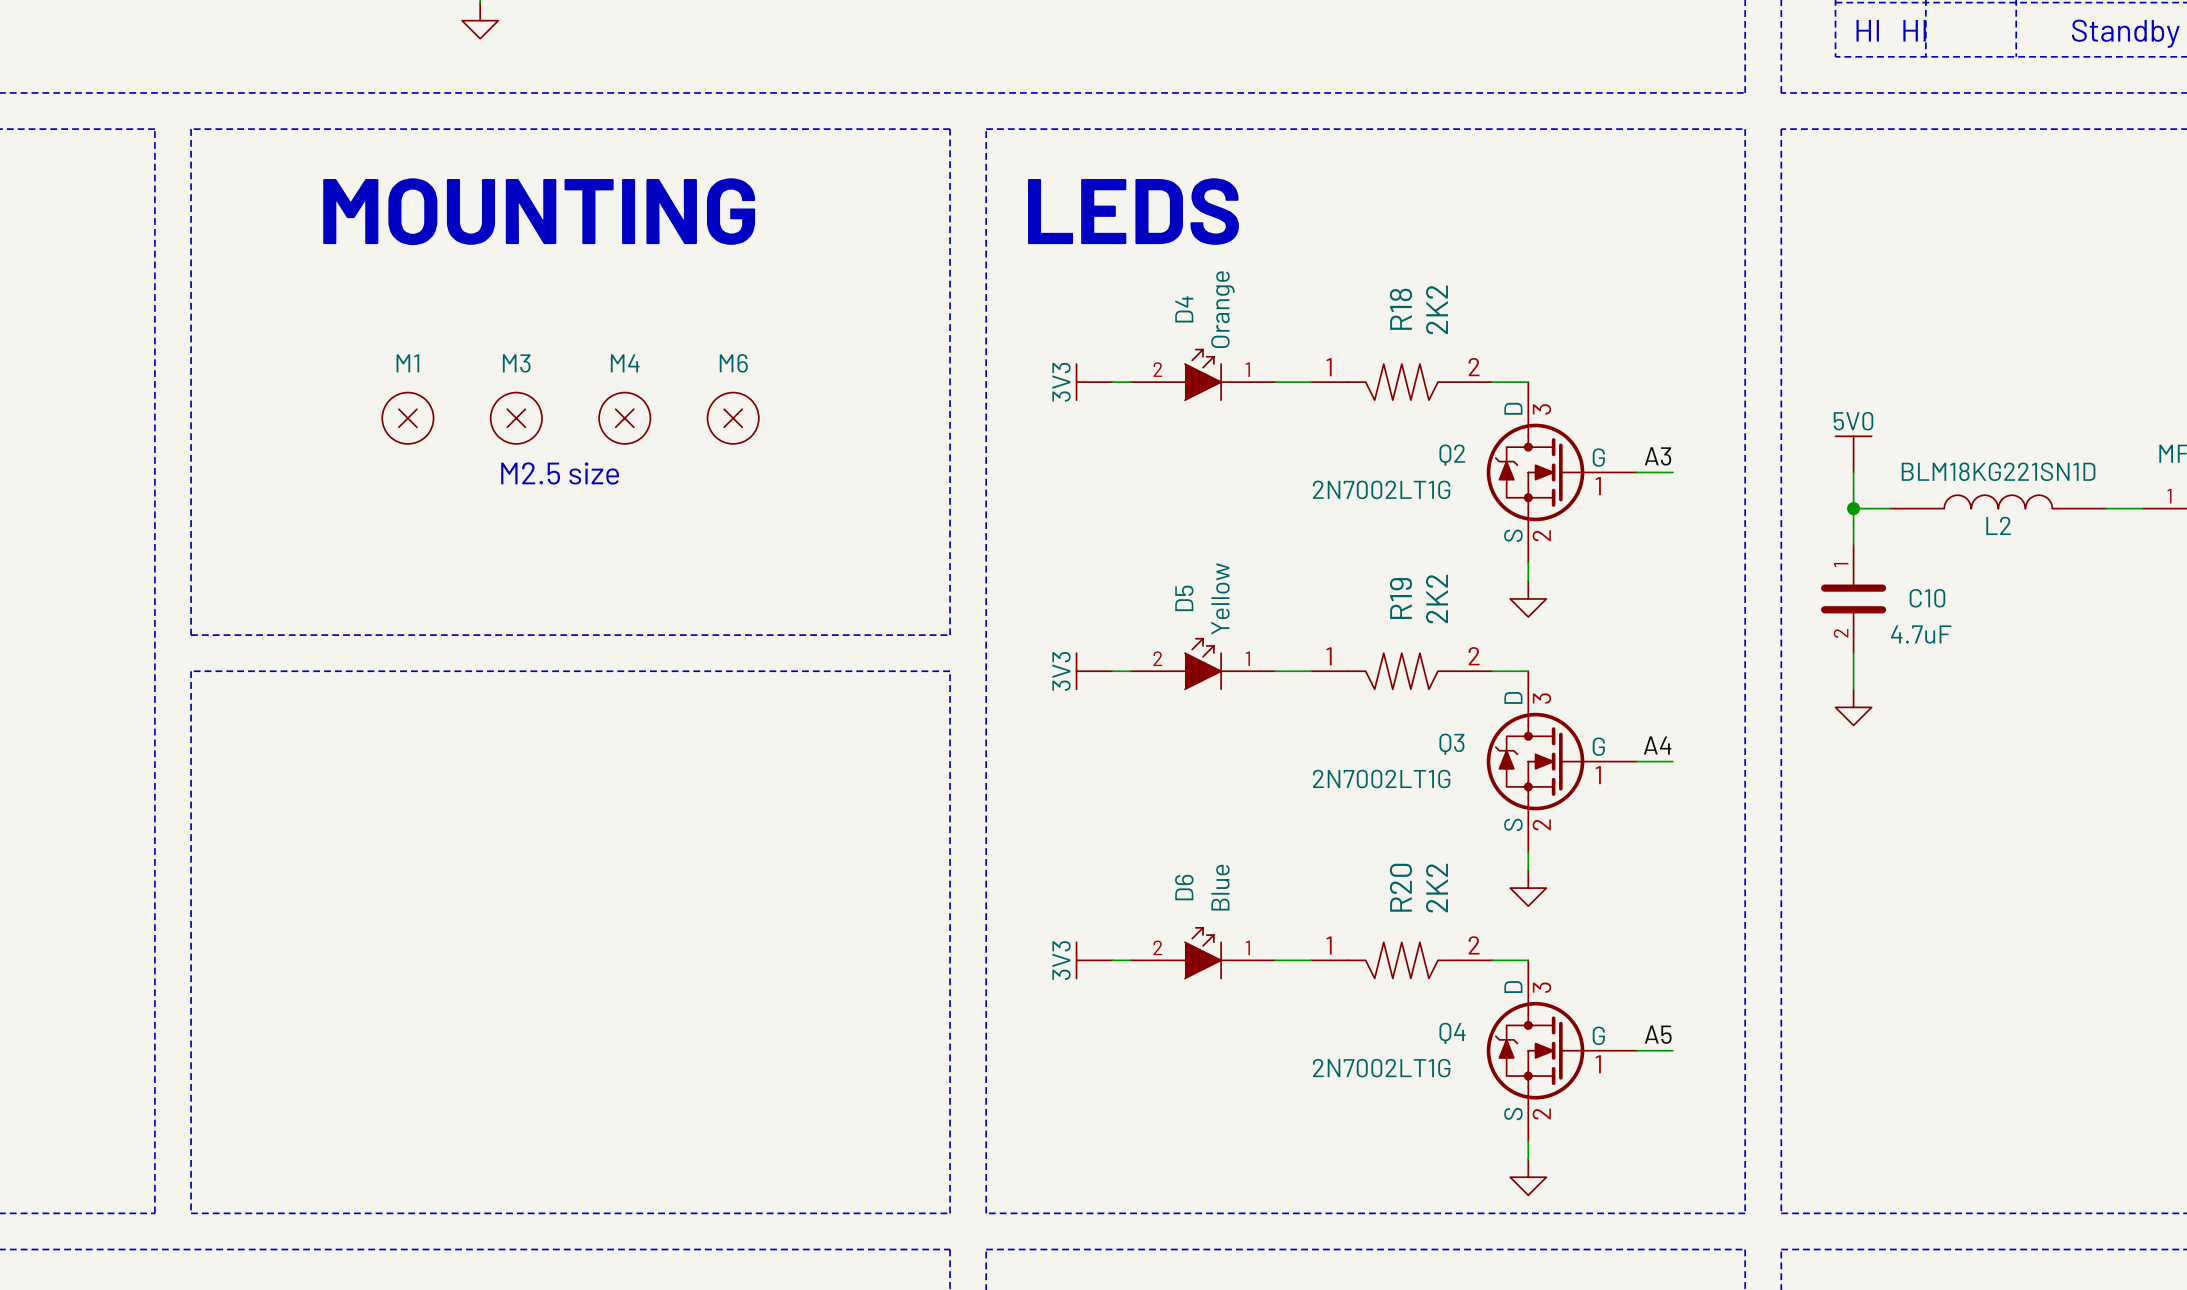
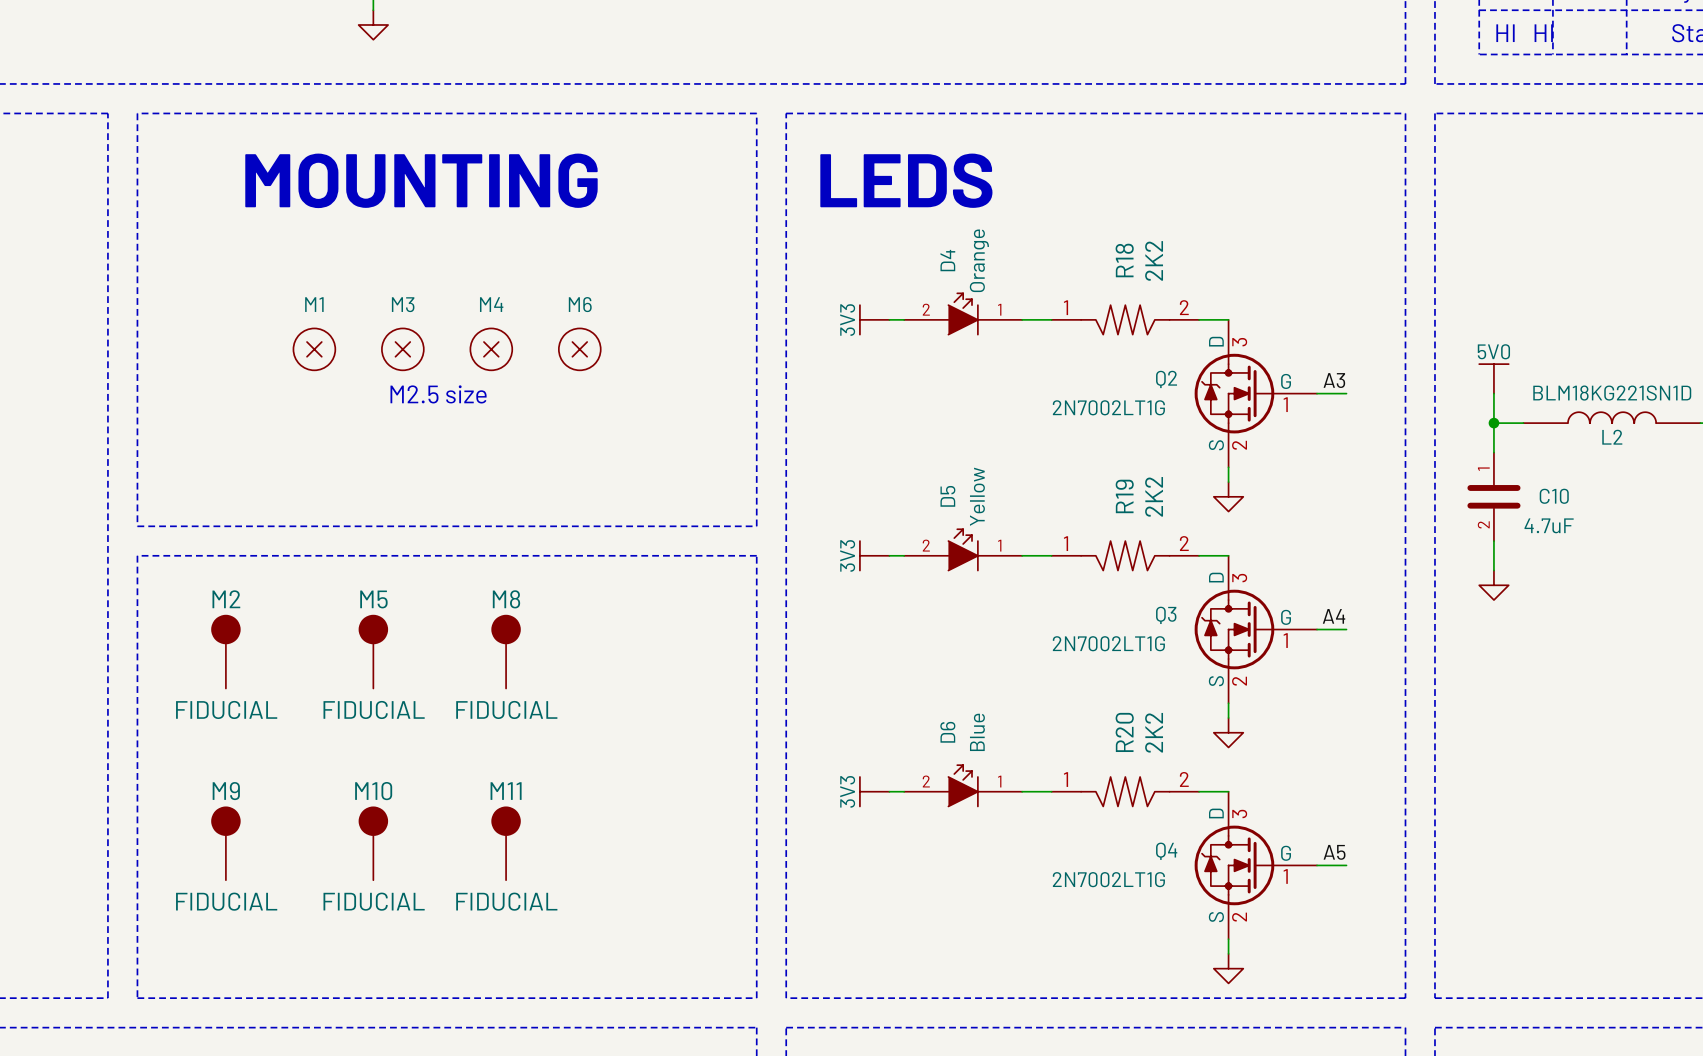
M2: none -> FIDUCIAL (225, 651)
M5: none -> FIDUCIAL (373, 651)
M8: none -> FIDUCIAL (506, 651)
M9: none -> FIDUCIAL (225, 843)
M10: none -> FIDUCIAL (373, 843)
M11: none -> FIDUCIAL (506, 843)

